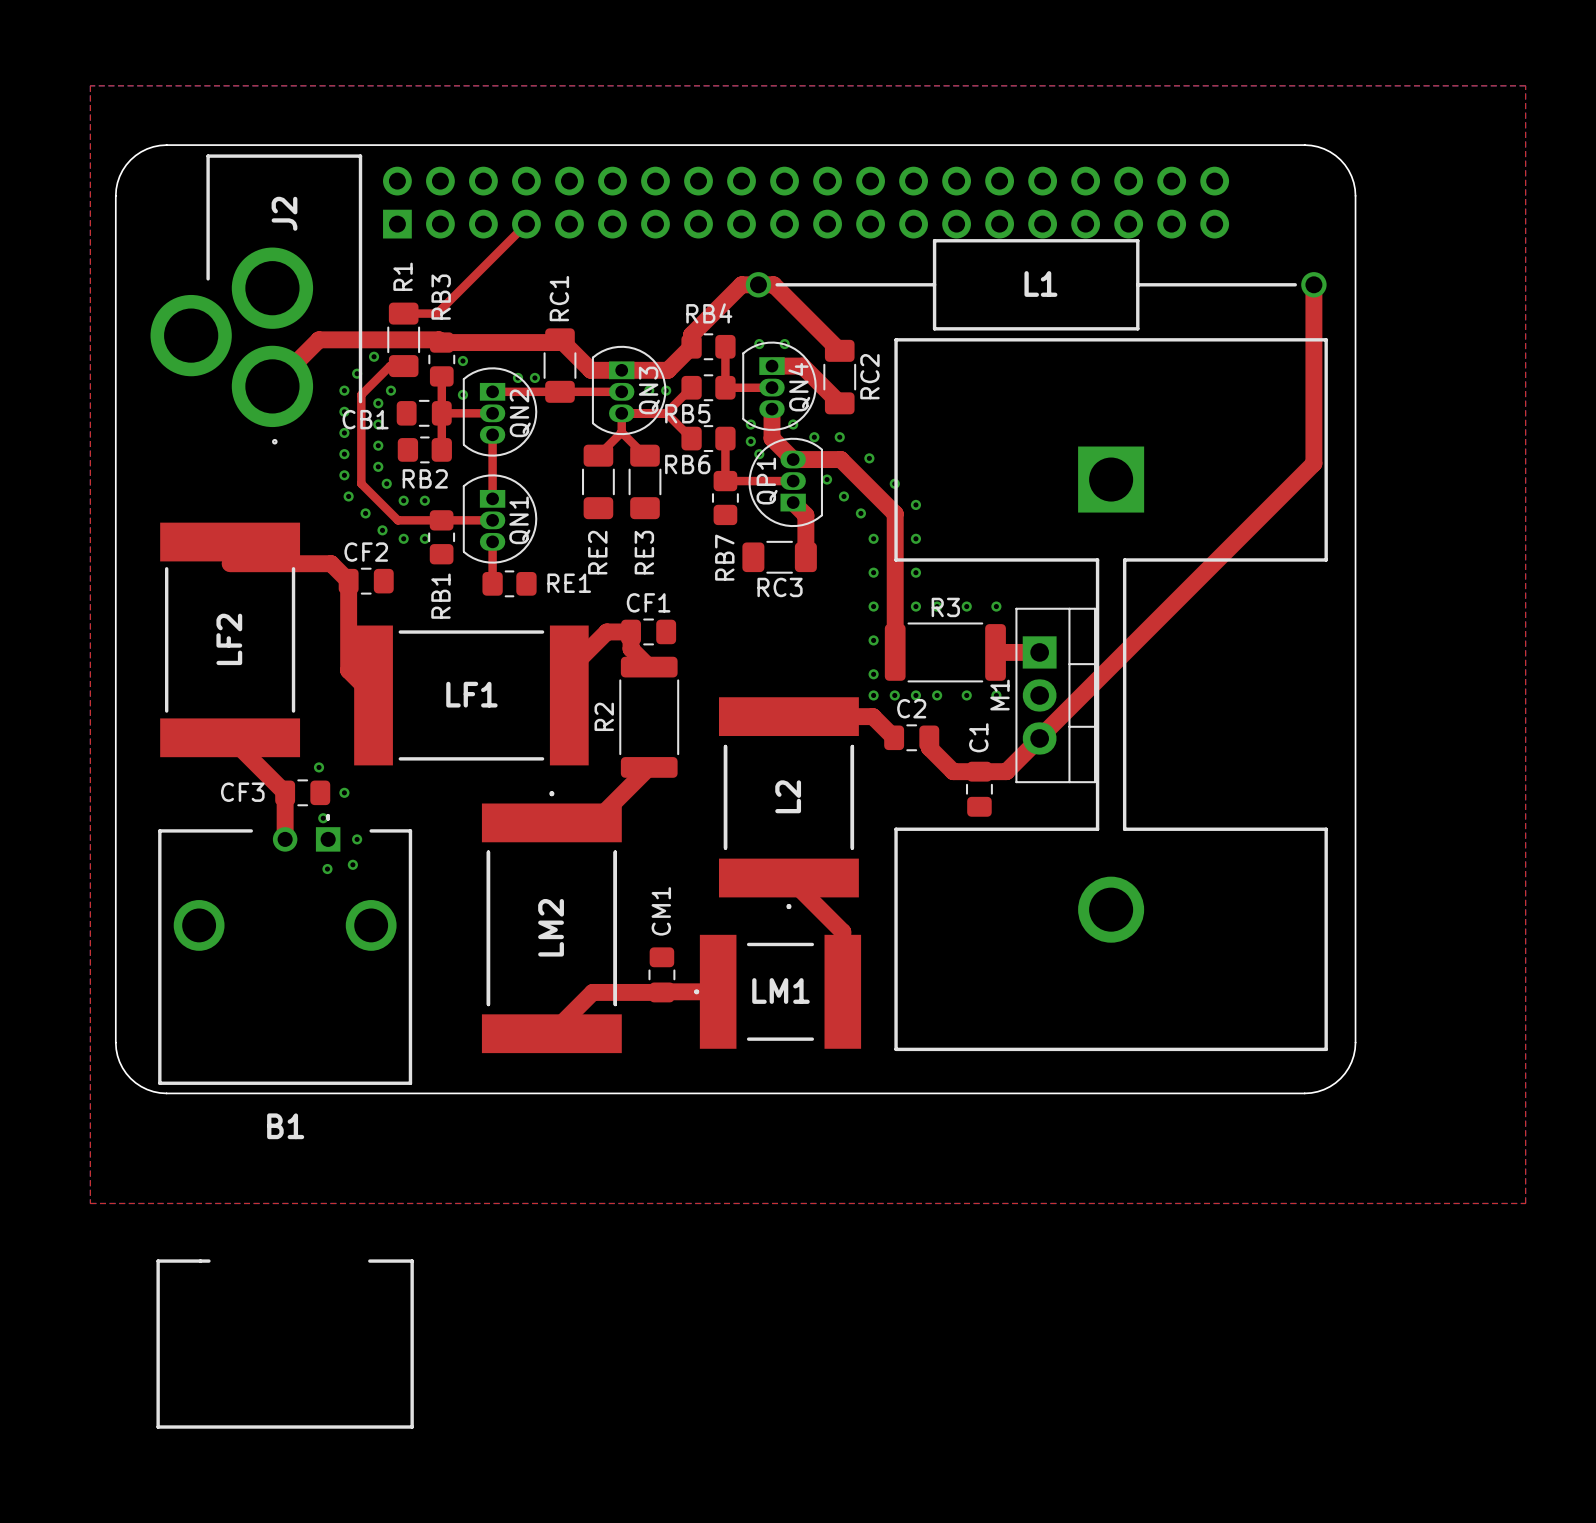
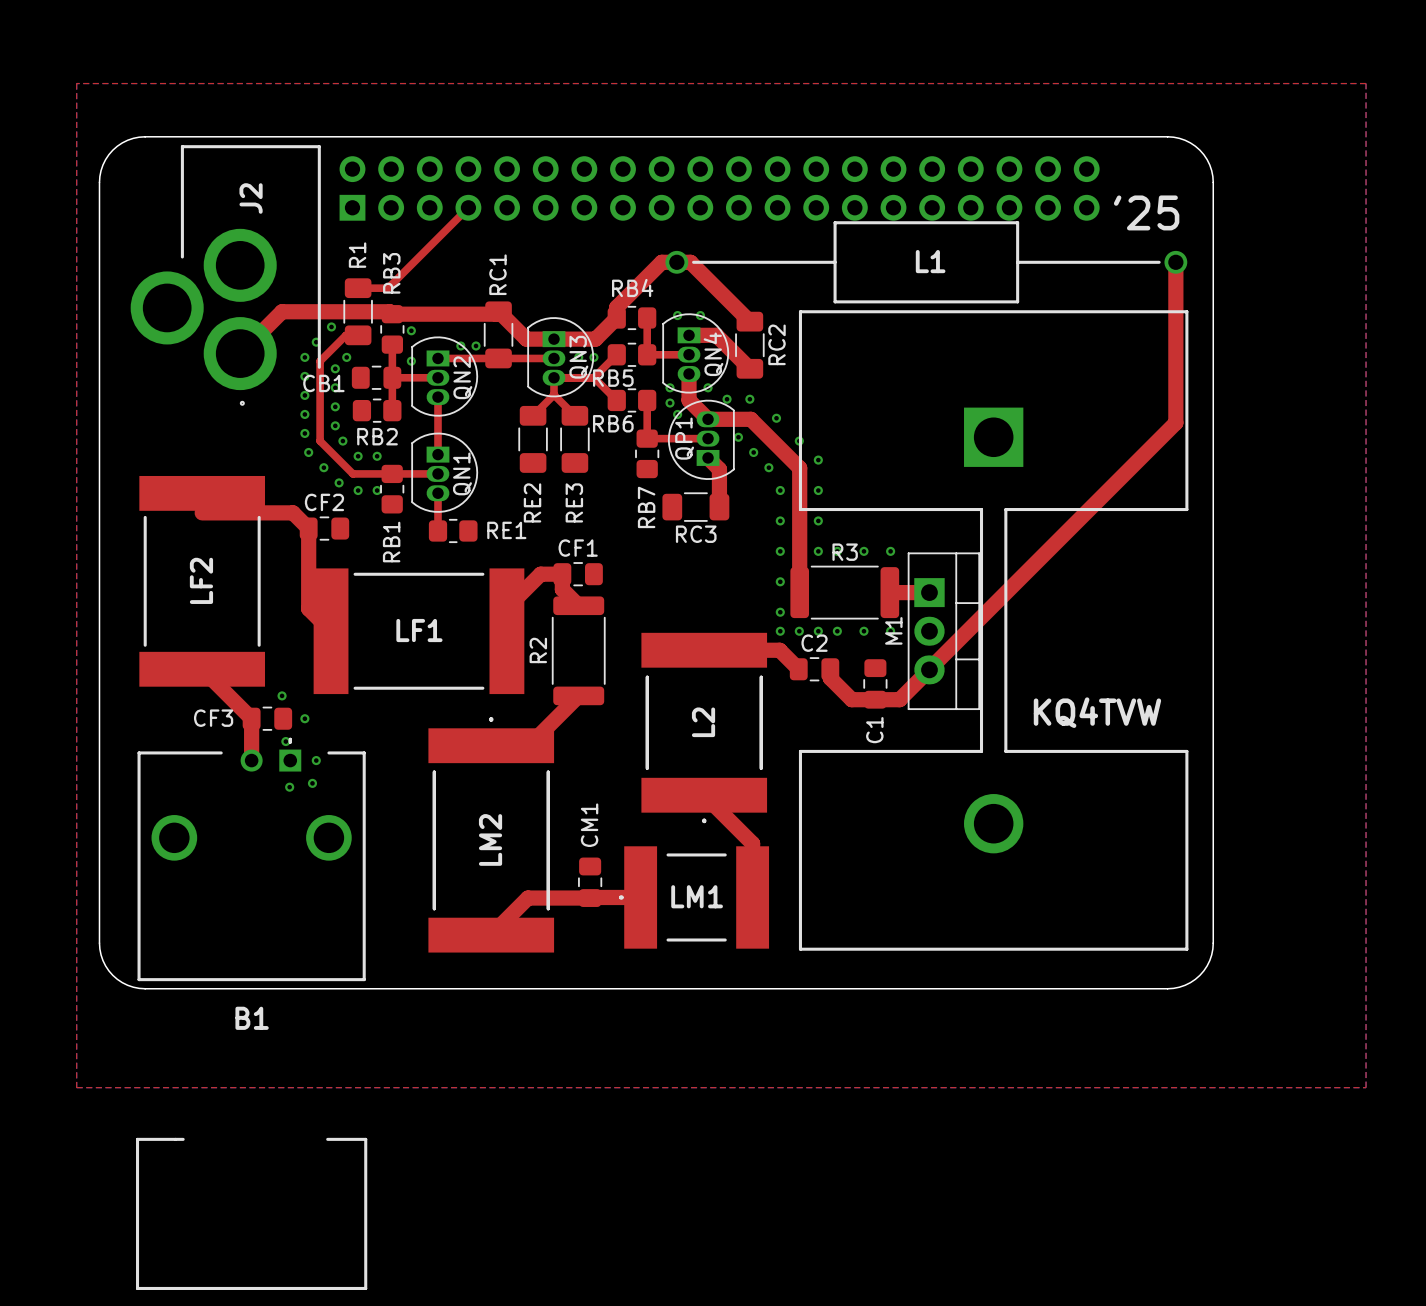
text: none -> '25 (1146, 212)
C1 name position: C1 (978, 737) -> C1 (874, 730)
text: none -> KQ4TVW (1097, 712)
C1 position: (979, 789) -> (875, 683)

